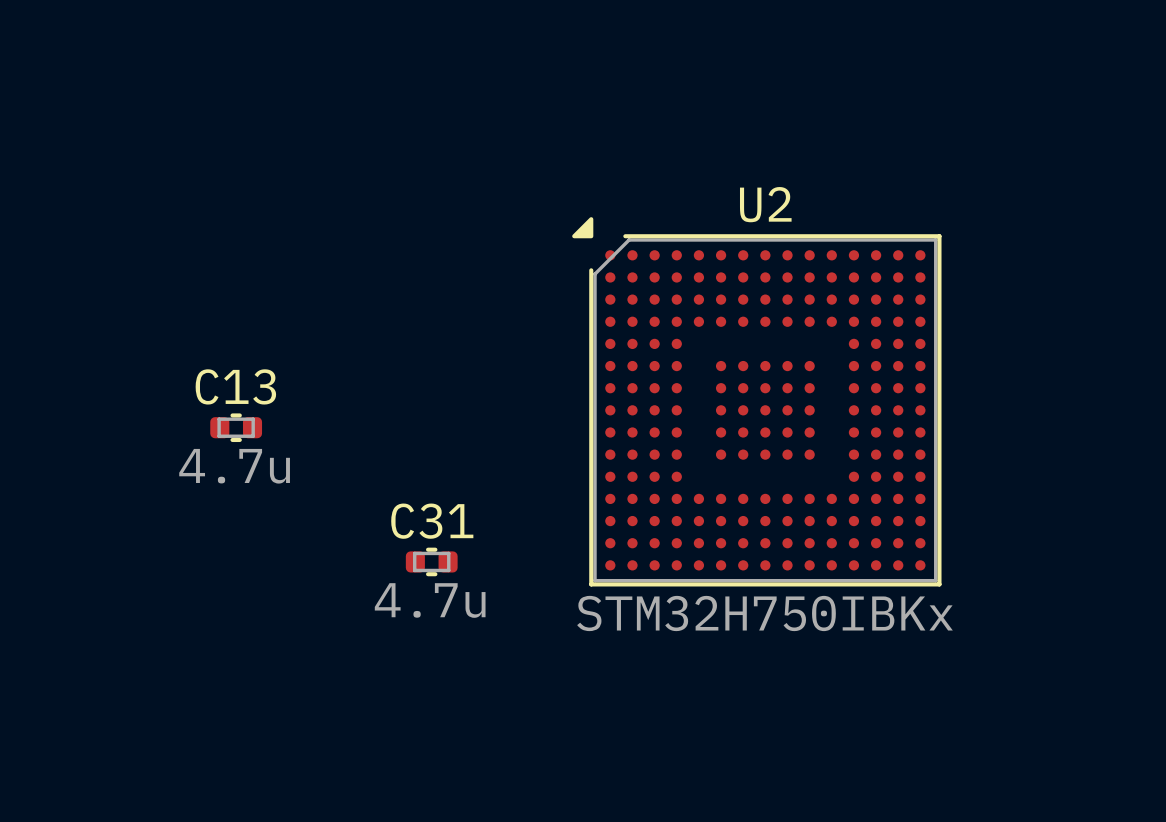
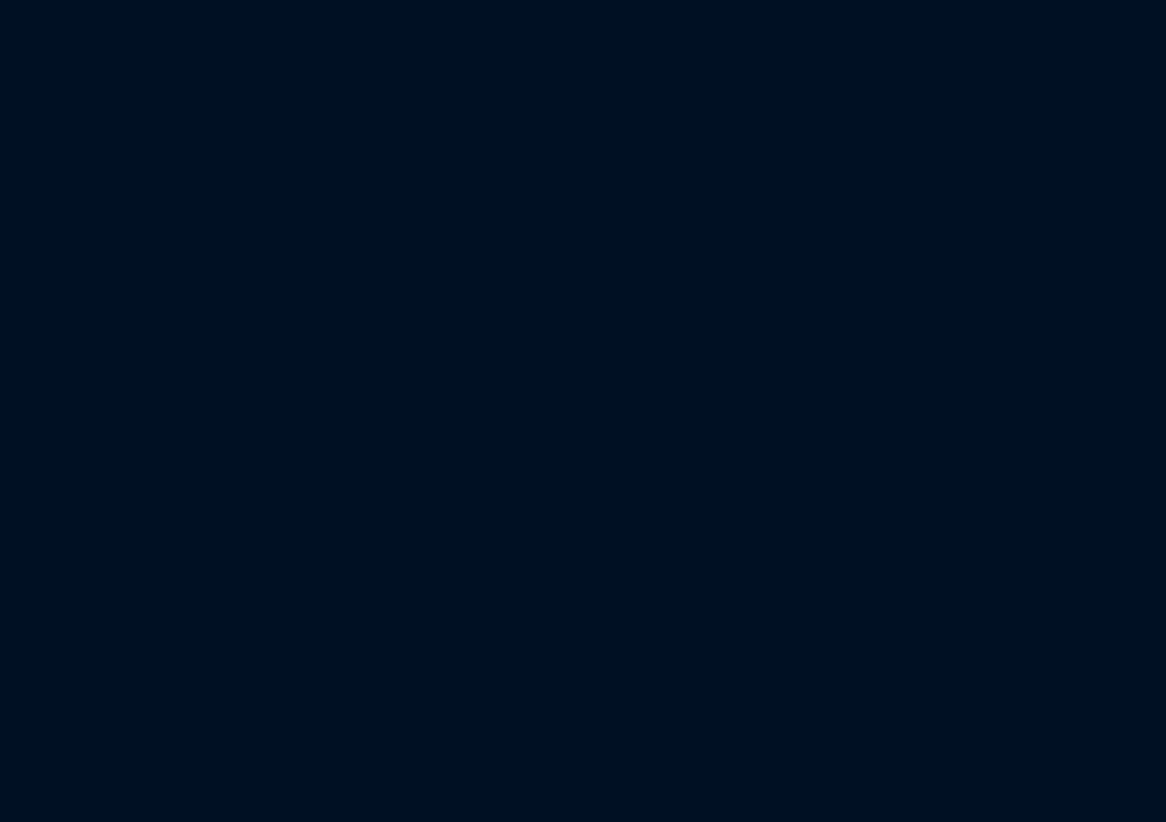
U2: STM32H750IBKx (756, 401) -> none
C13: 4.7u (236, 427) -> none
C31: 4.7u (431, 561) -> none

